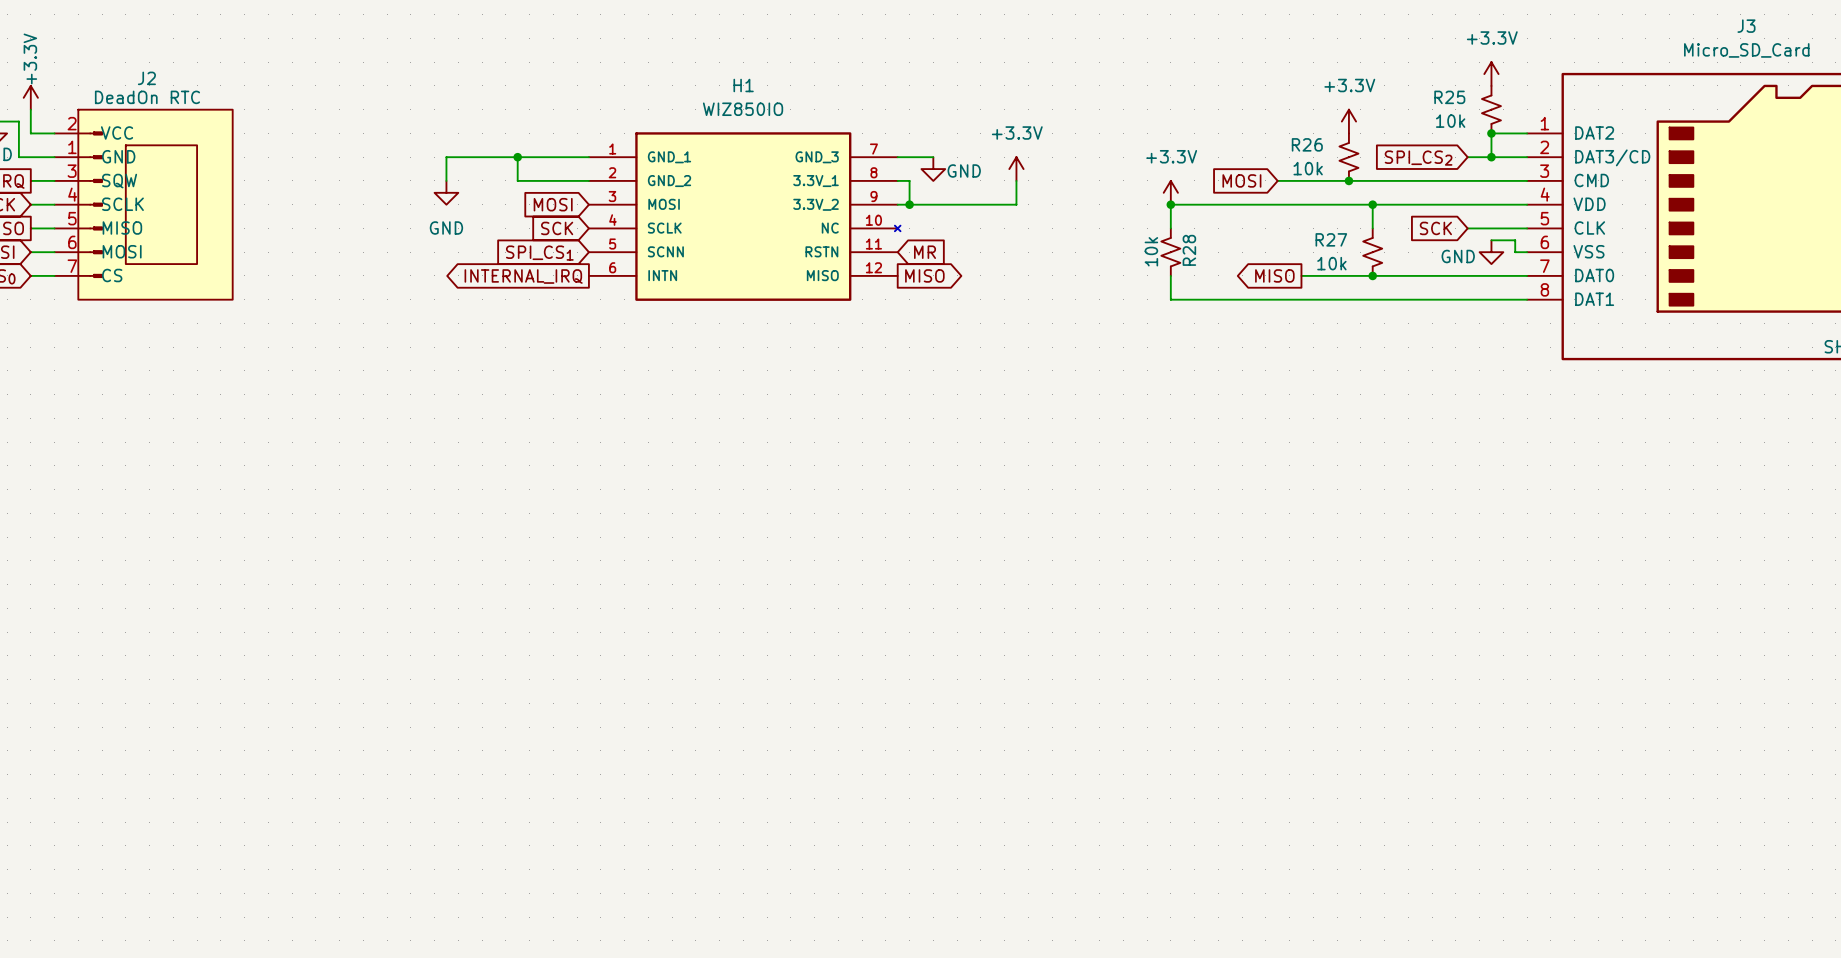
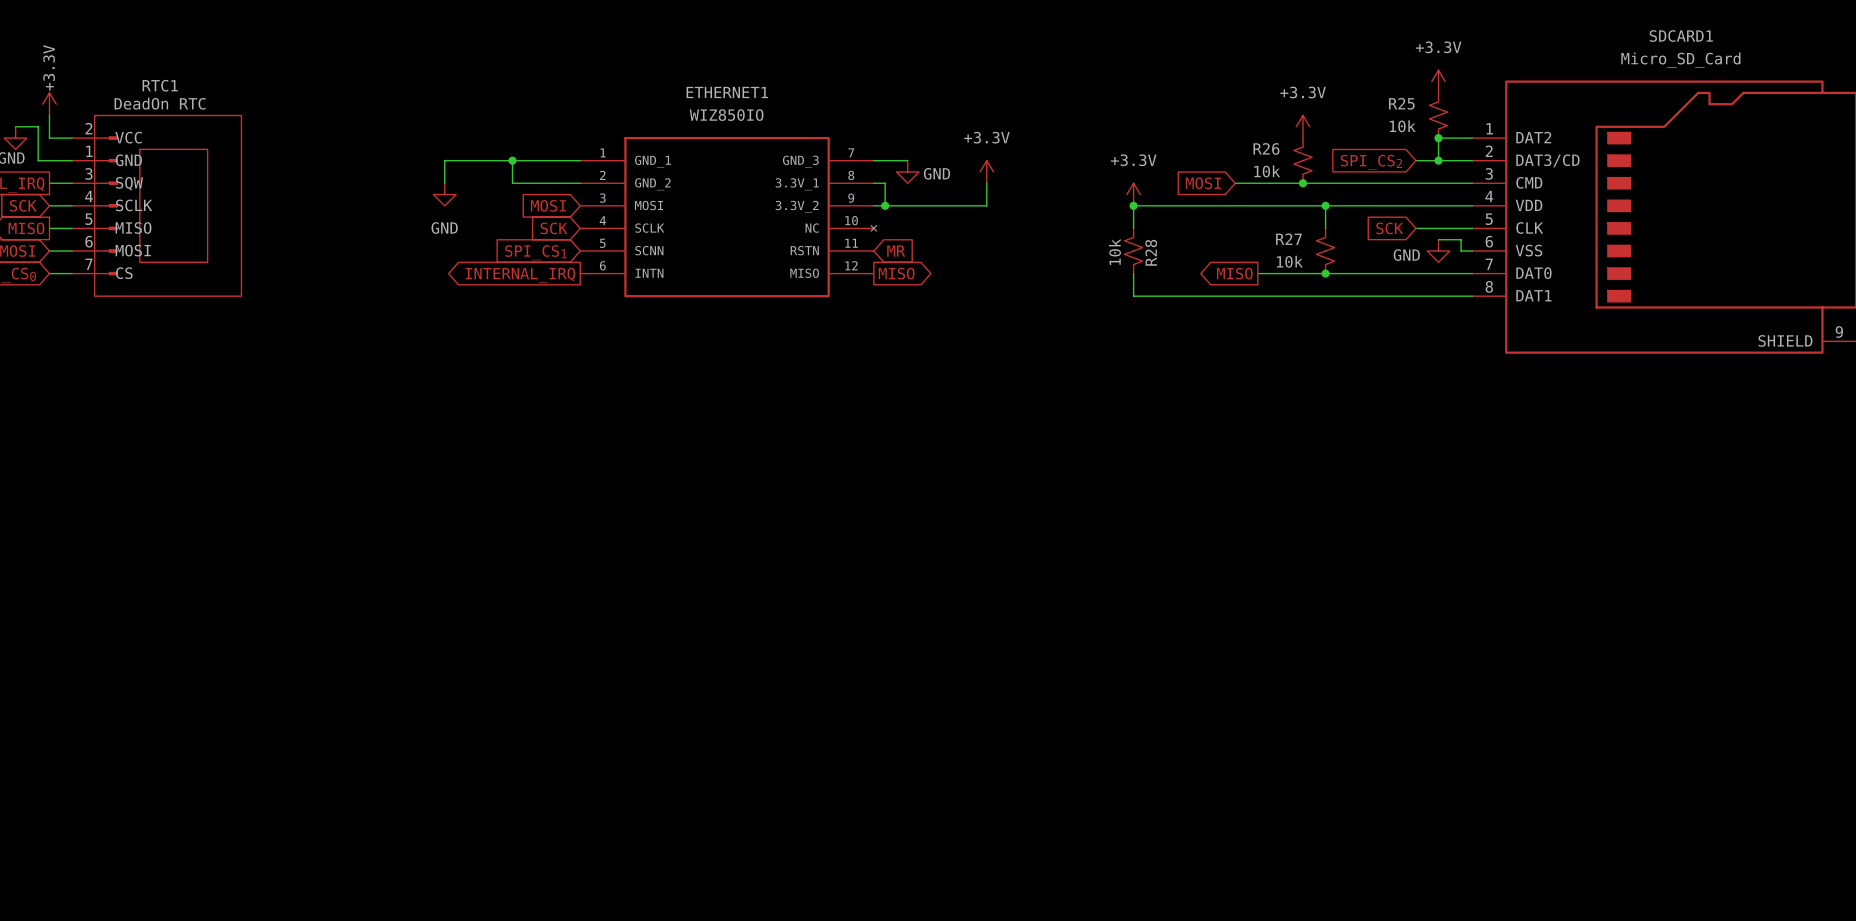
J3 name: J3 (1746, 26) -> SDCARD1 (1681, 36)
J2 name: J2 (146, 78) -> RTC1 (160, 85)
H1 name: H1 (743, 85) -> ETHERNET1 (727, 92)

